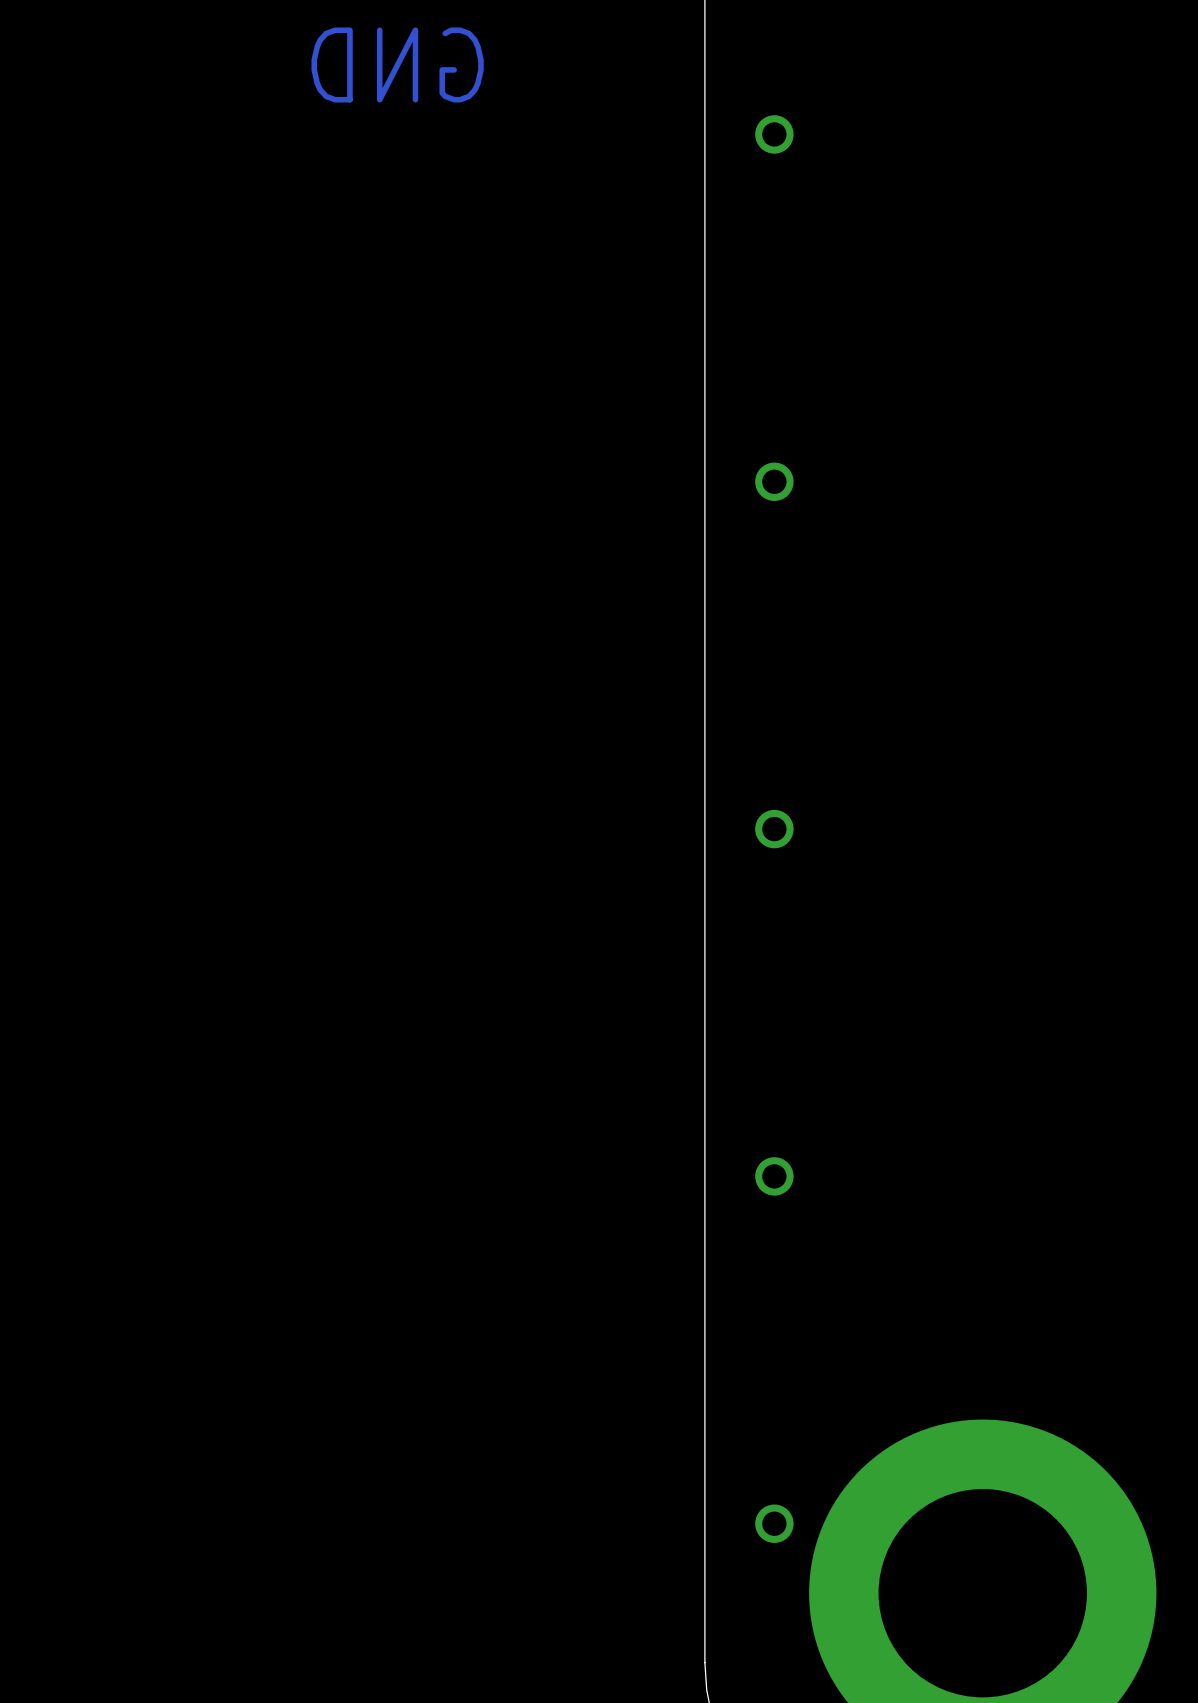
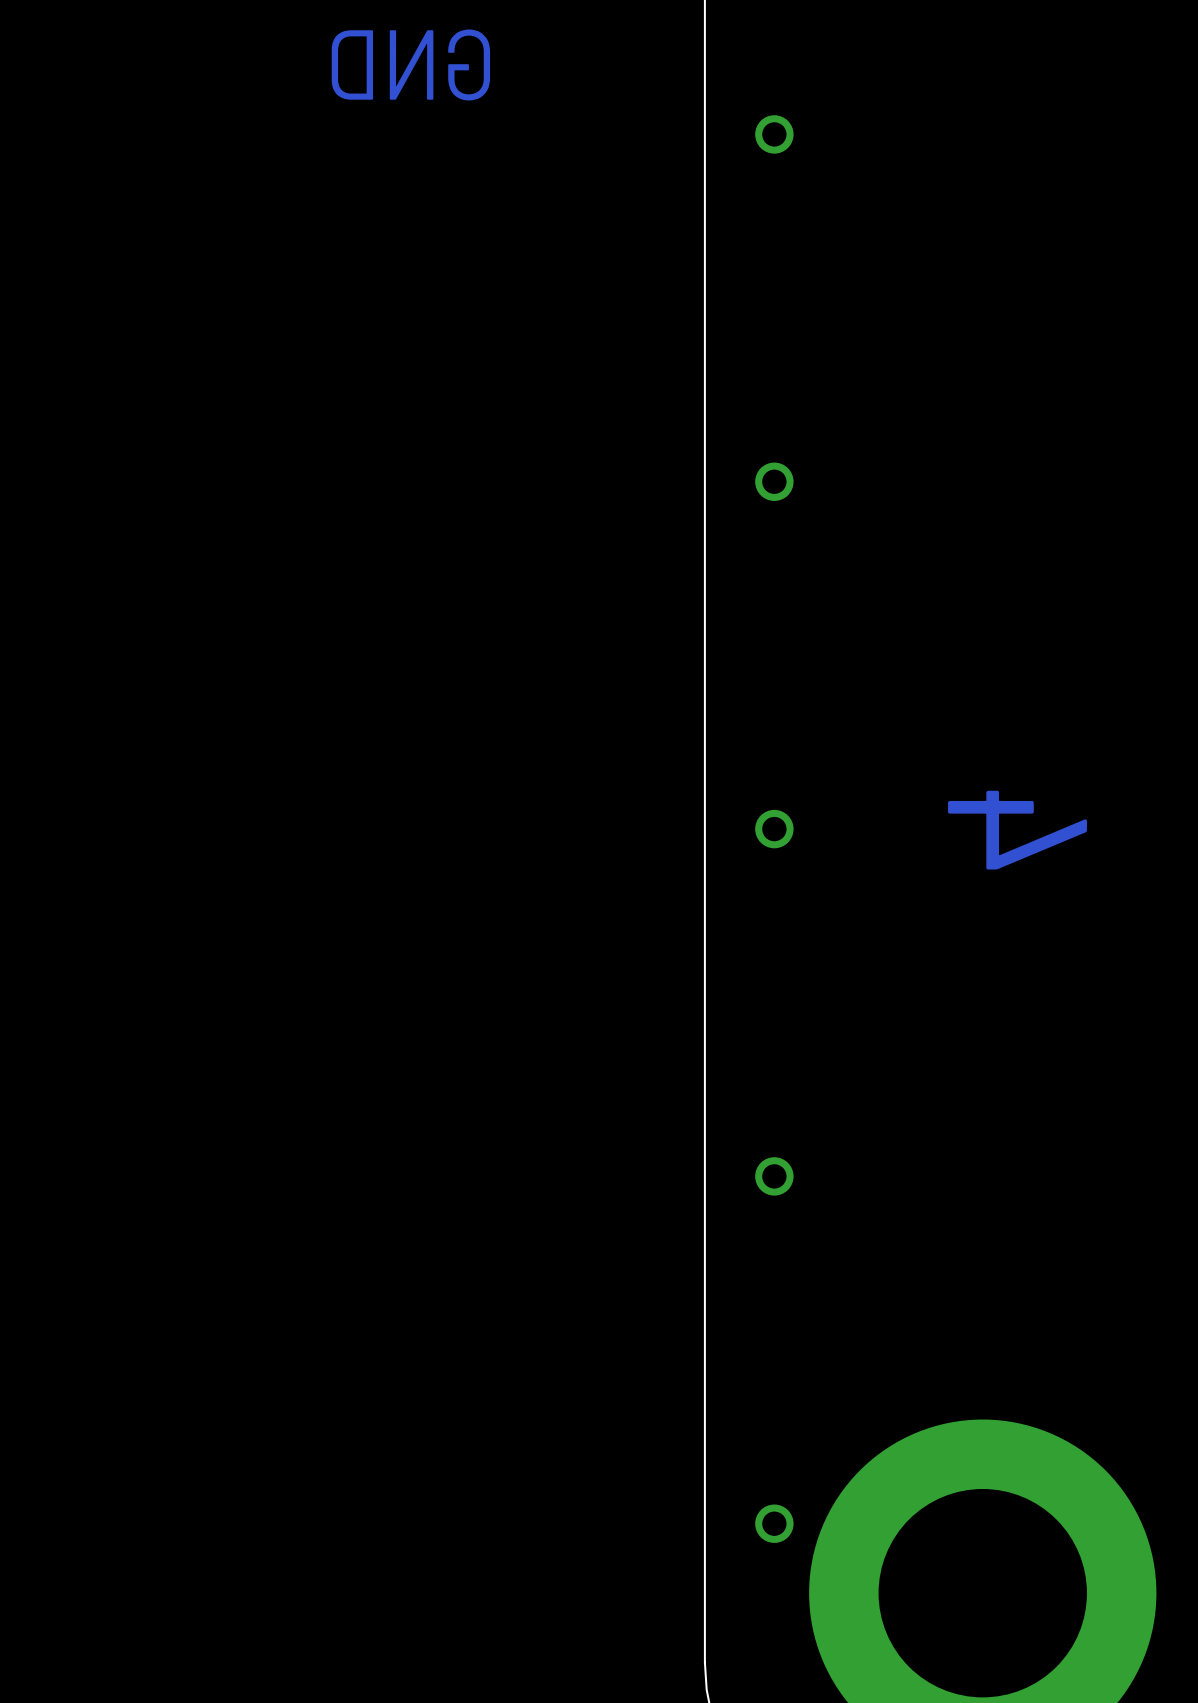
drawing: none -> [948, 790, 1087, 870]

